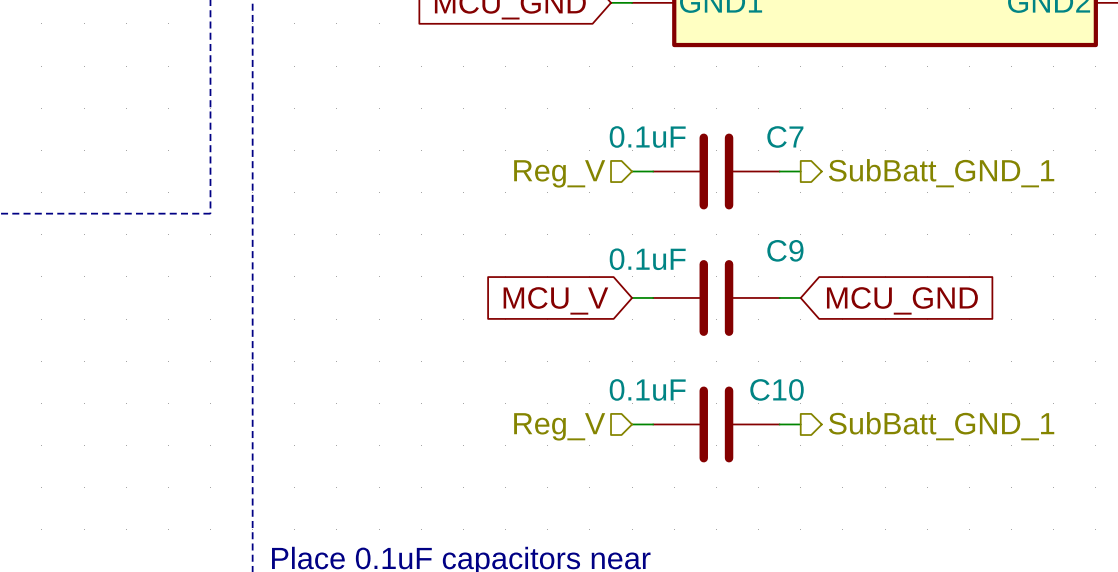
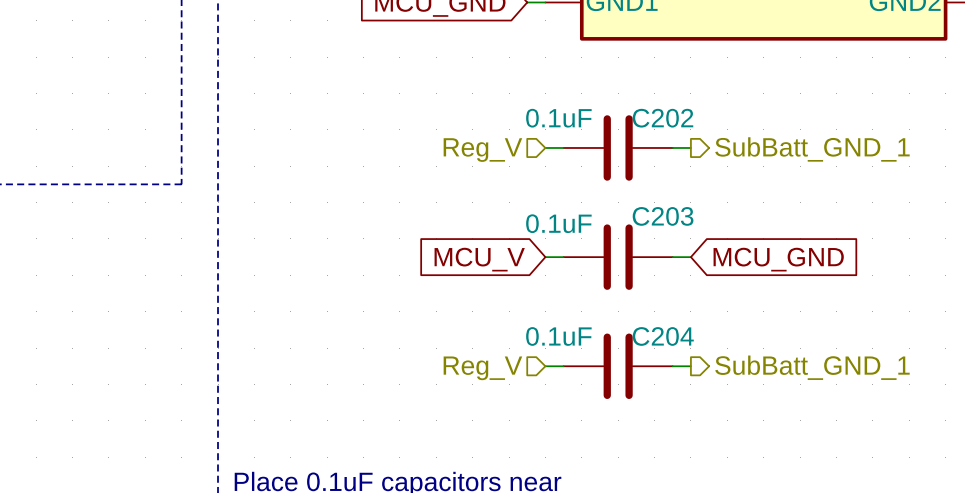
C7 name: C7 (785, 136) -> C202 (662, 118)
C9 name: C9 (785, 250) -> C203 (663, 216)
C10 name: C10 (777, 389) -> C204 (663, 336)

